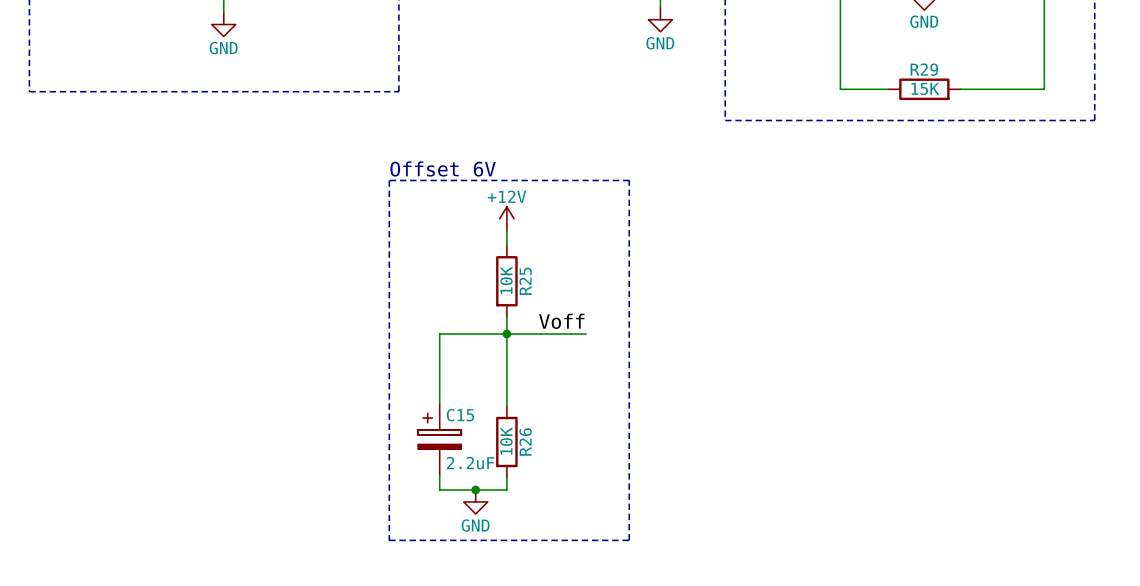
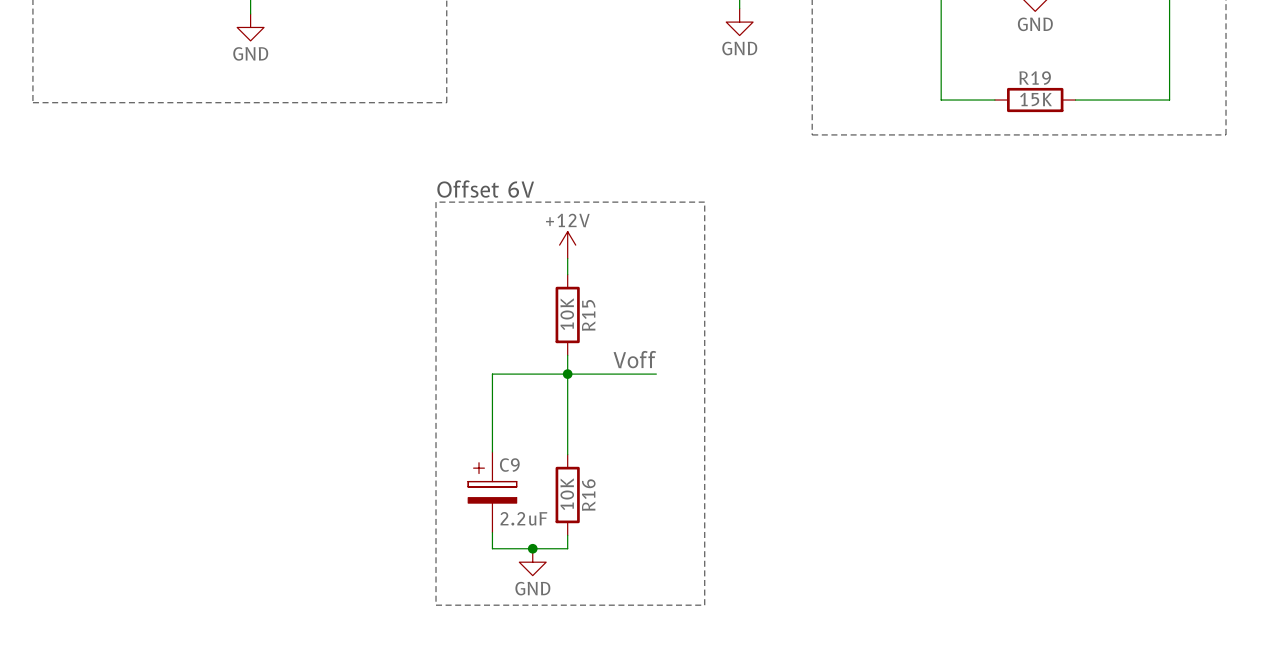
R29 name: R29 (924, 69) -> R19 (1035, 78)
R25 name: R25 (525, 281) -> R15 (588, 315)
C15 name: C15 (460, 415) -> C9 (509, 465)
R26 name: R26 (525, 441) -> R16 (588, 495)

